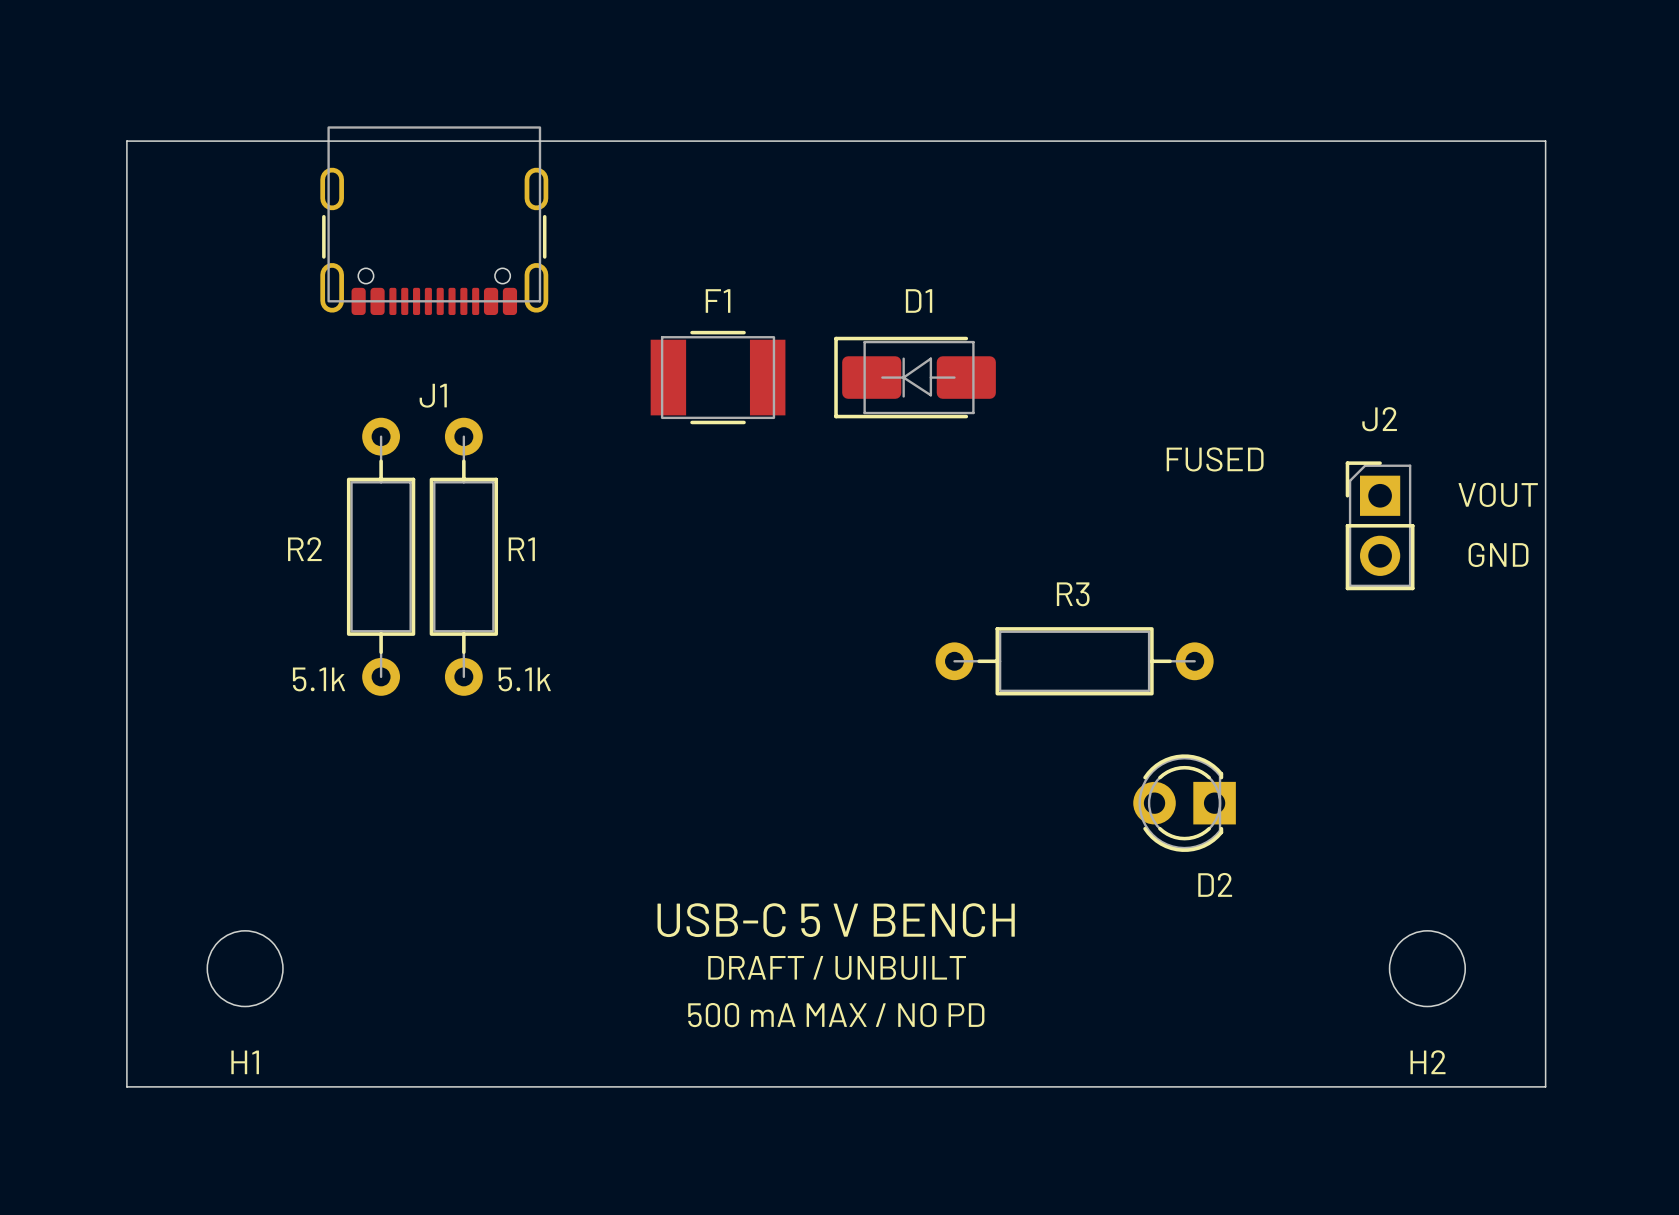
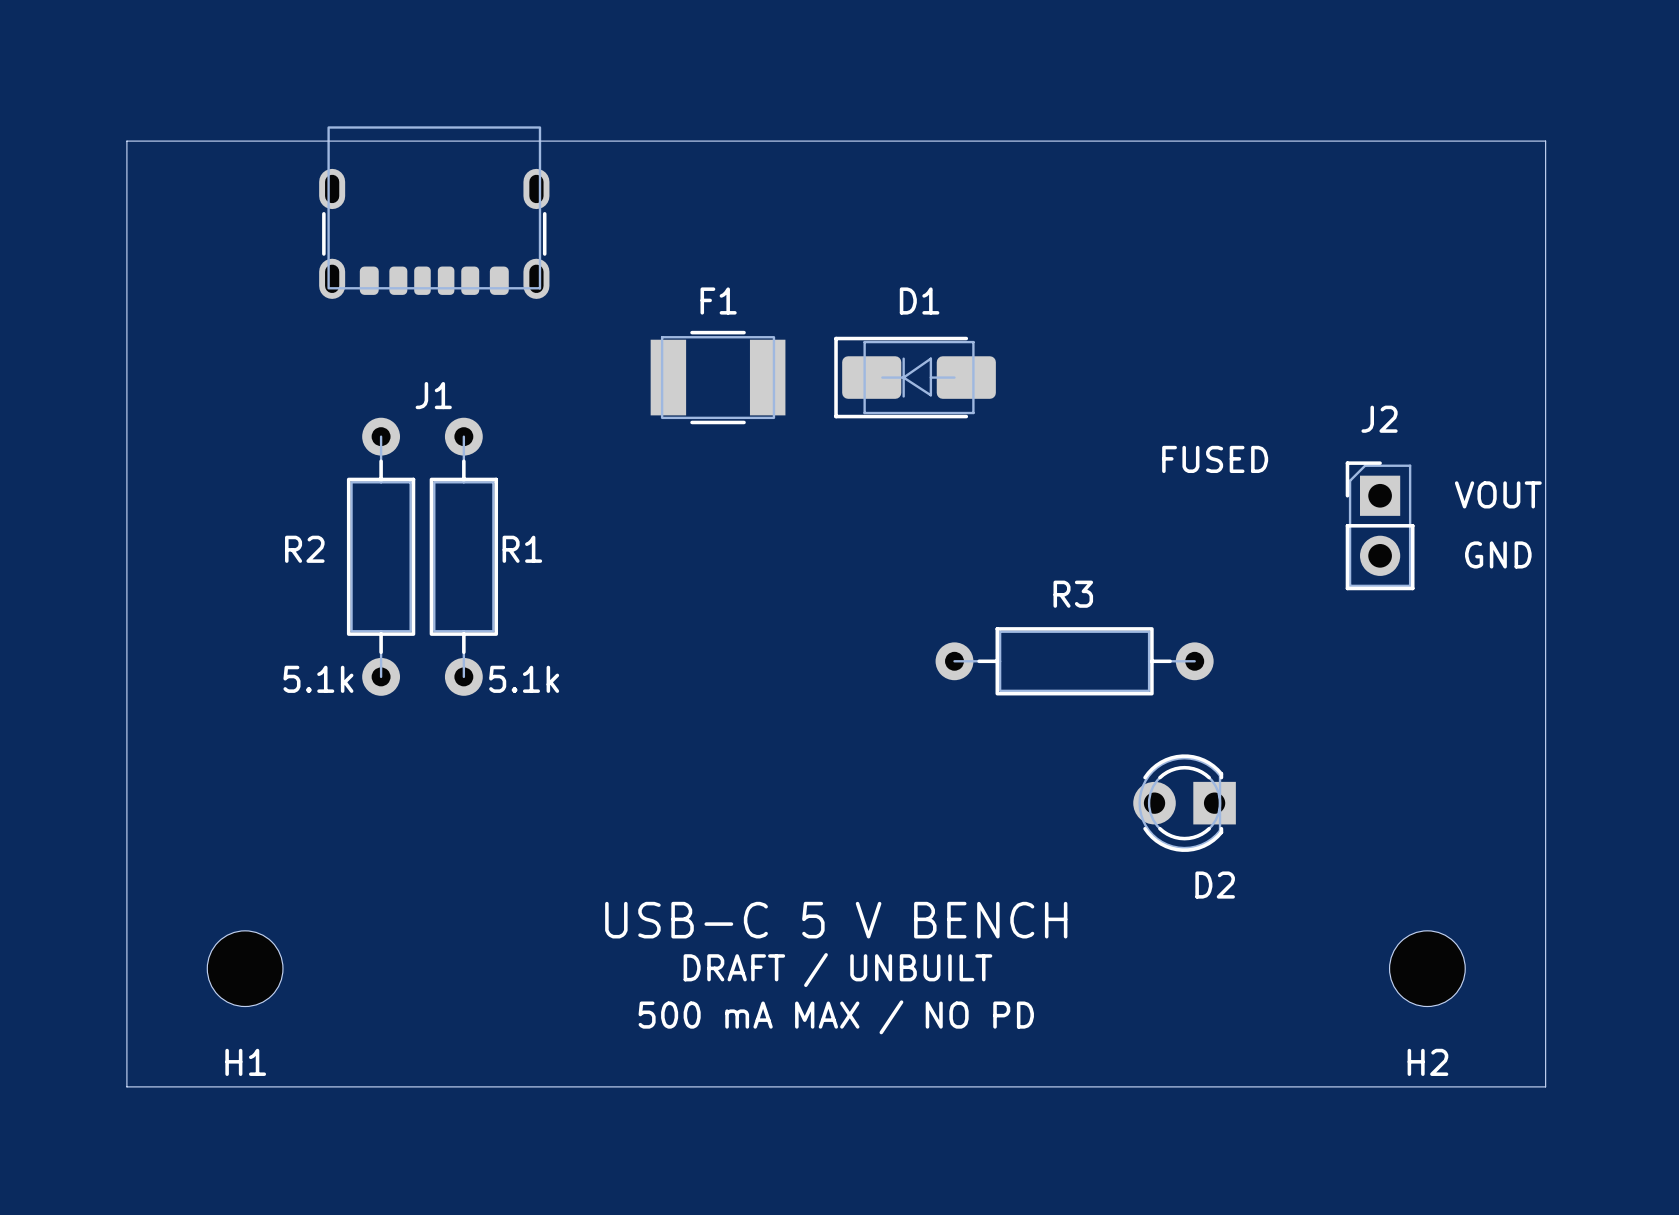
J1 footprint: [320, 126, 549, 316] -> [319, 126, 550, 299]

